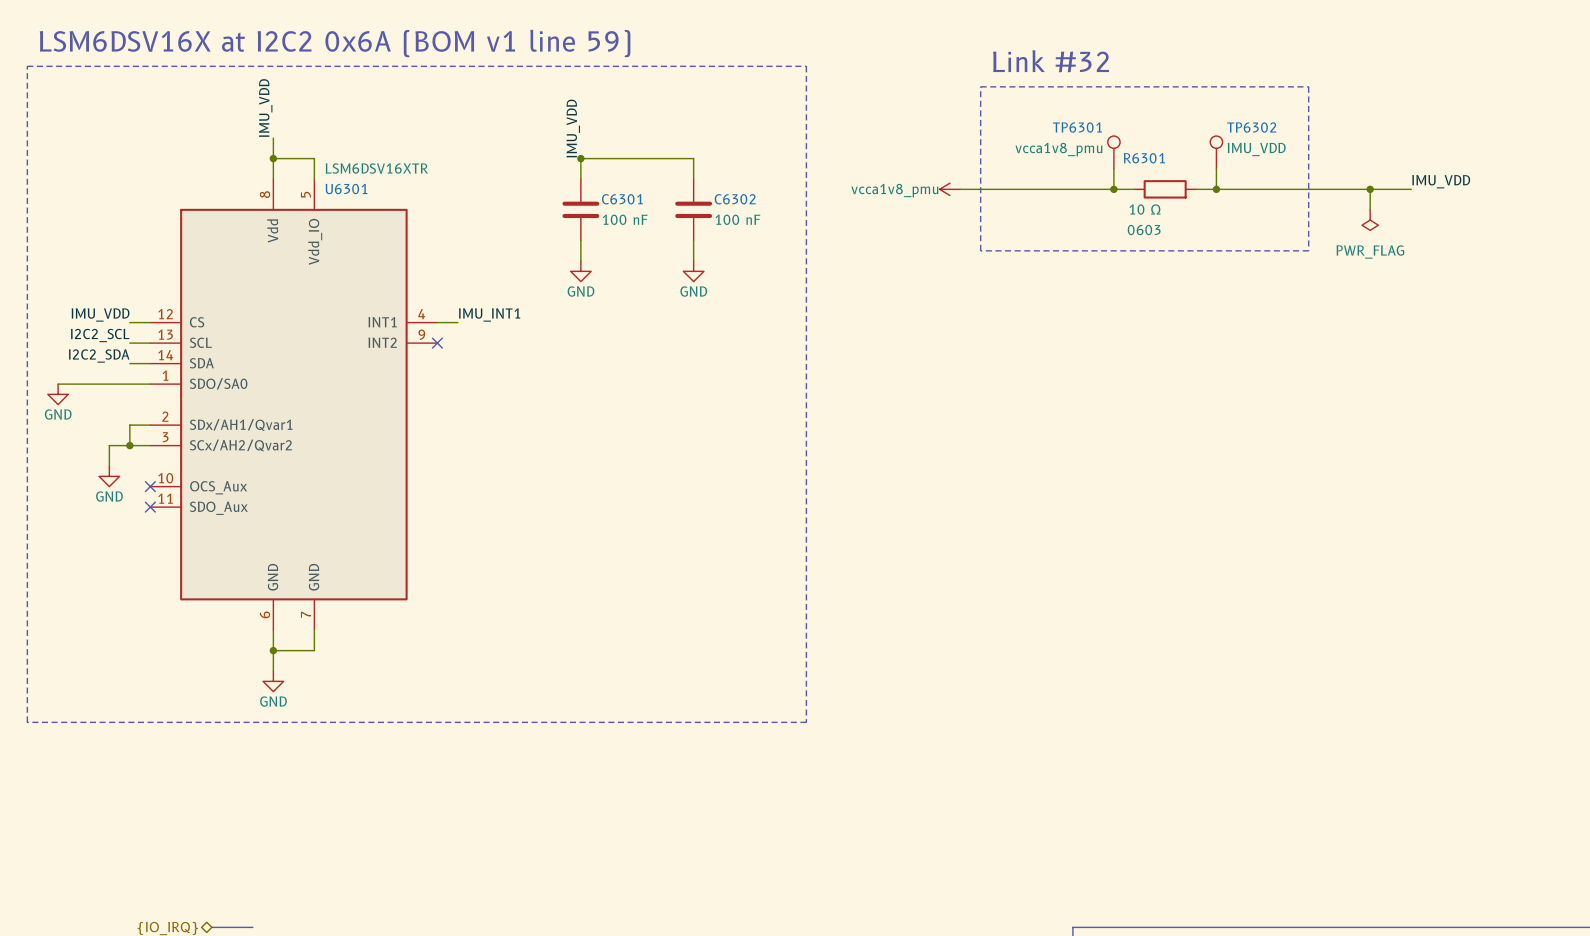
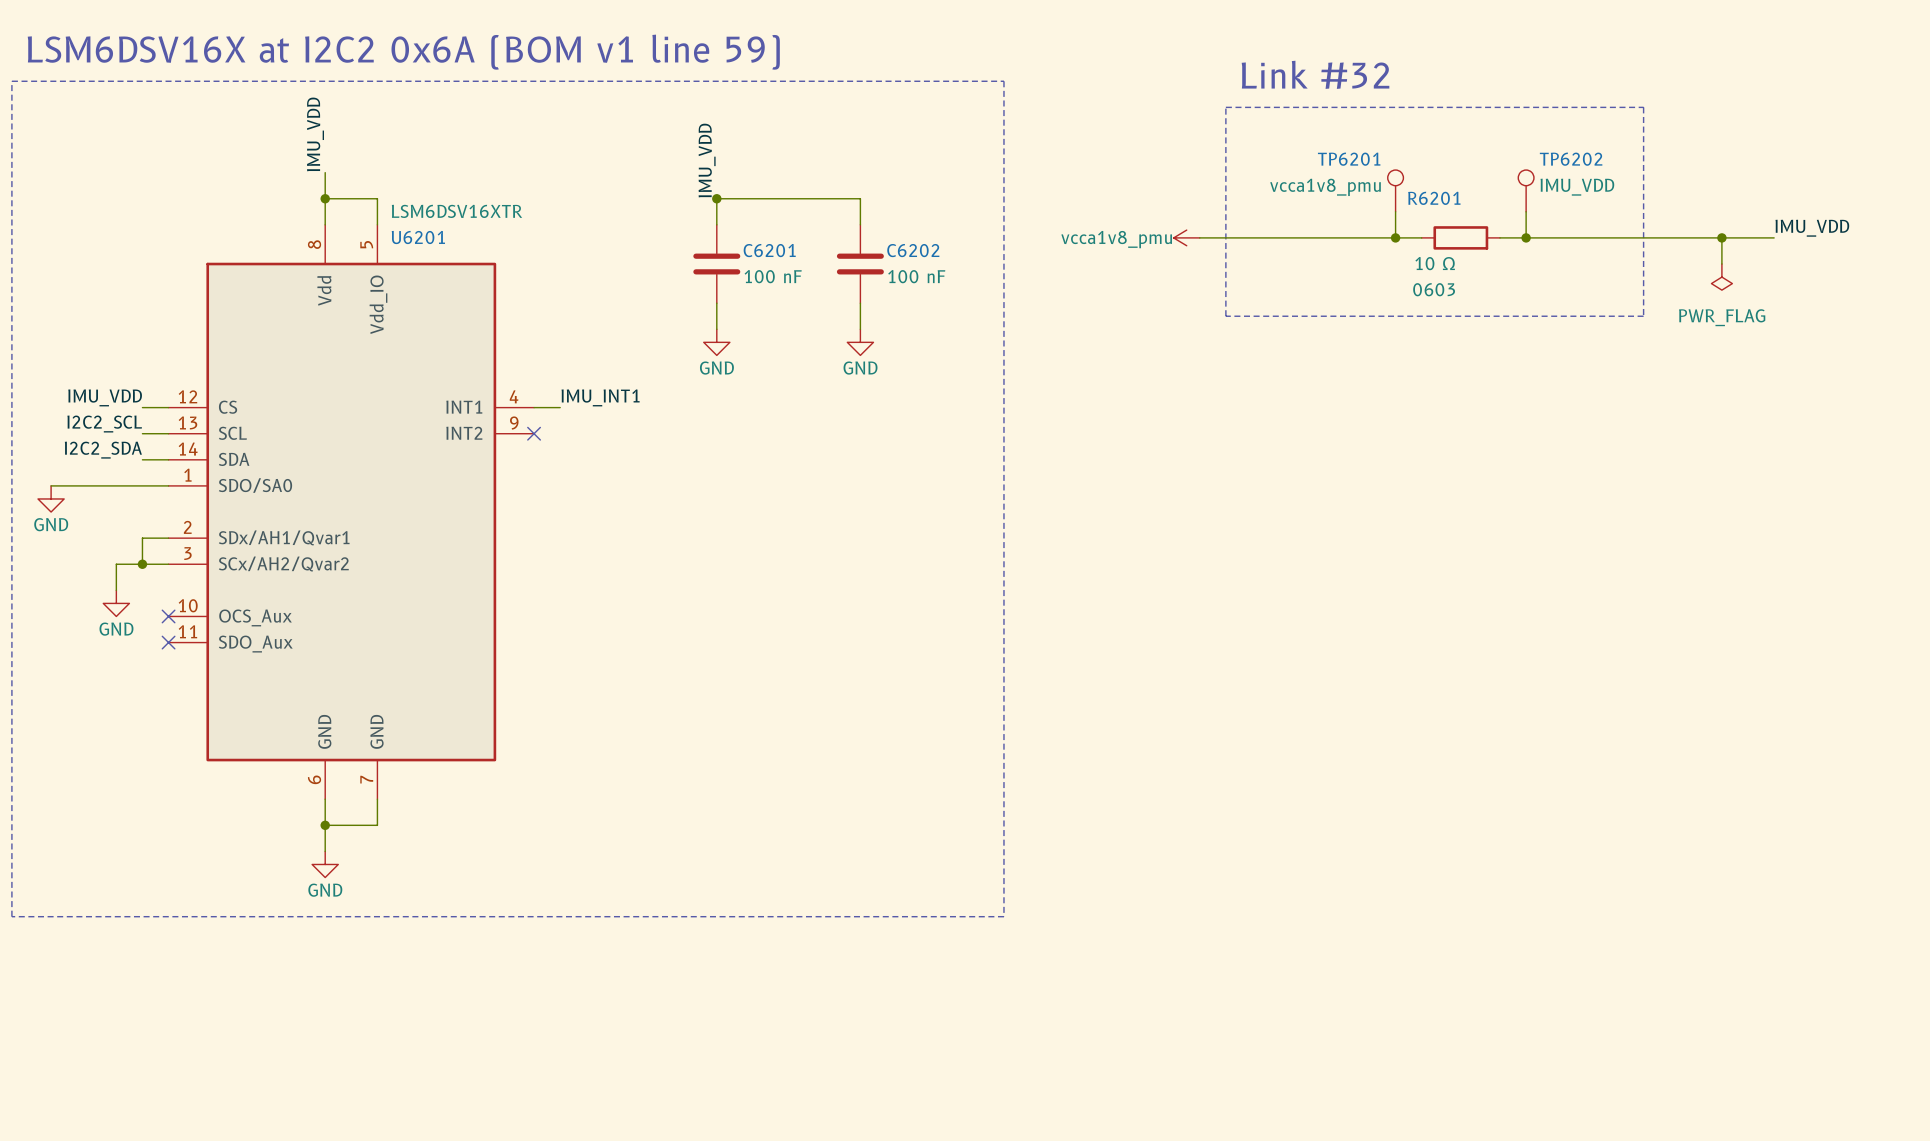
TP6301 name: TP6301 (1077, 127) -> TP6201 (1349, 159)
TP6302 name: TP6302 (1251, 127) -> TP6202 (1571, 159)
R6301 name: R6301 (1144, 158) -> R6201 (1434, 198)
U6301 name: U6301 (346, 189) -> U6201 (418, 237)
C6301 name: C6301 (622, 199) -> C6201 (769, 250)
C6302 name: C6302 (735, 199) -> C6202 (913, 250)

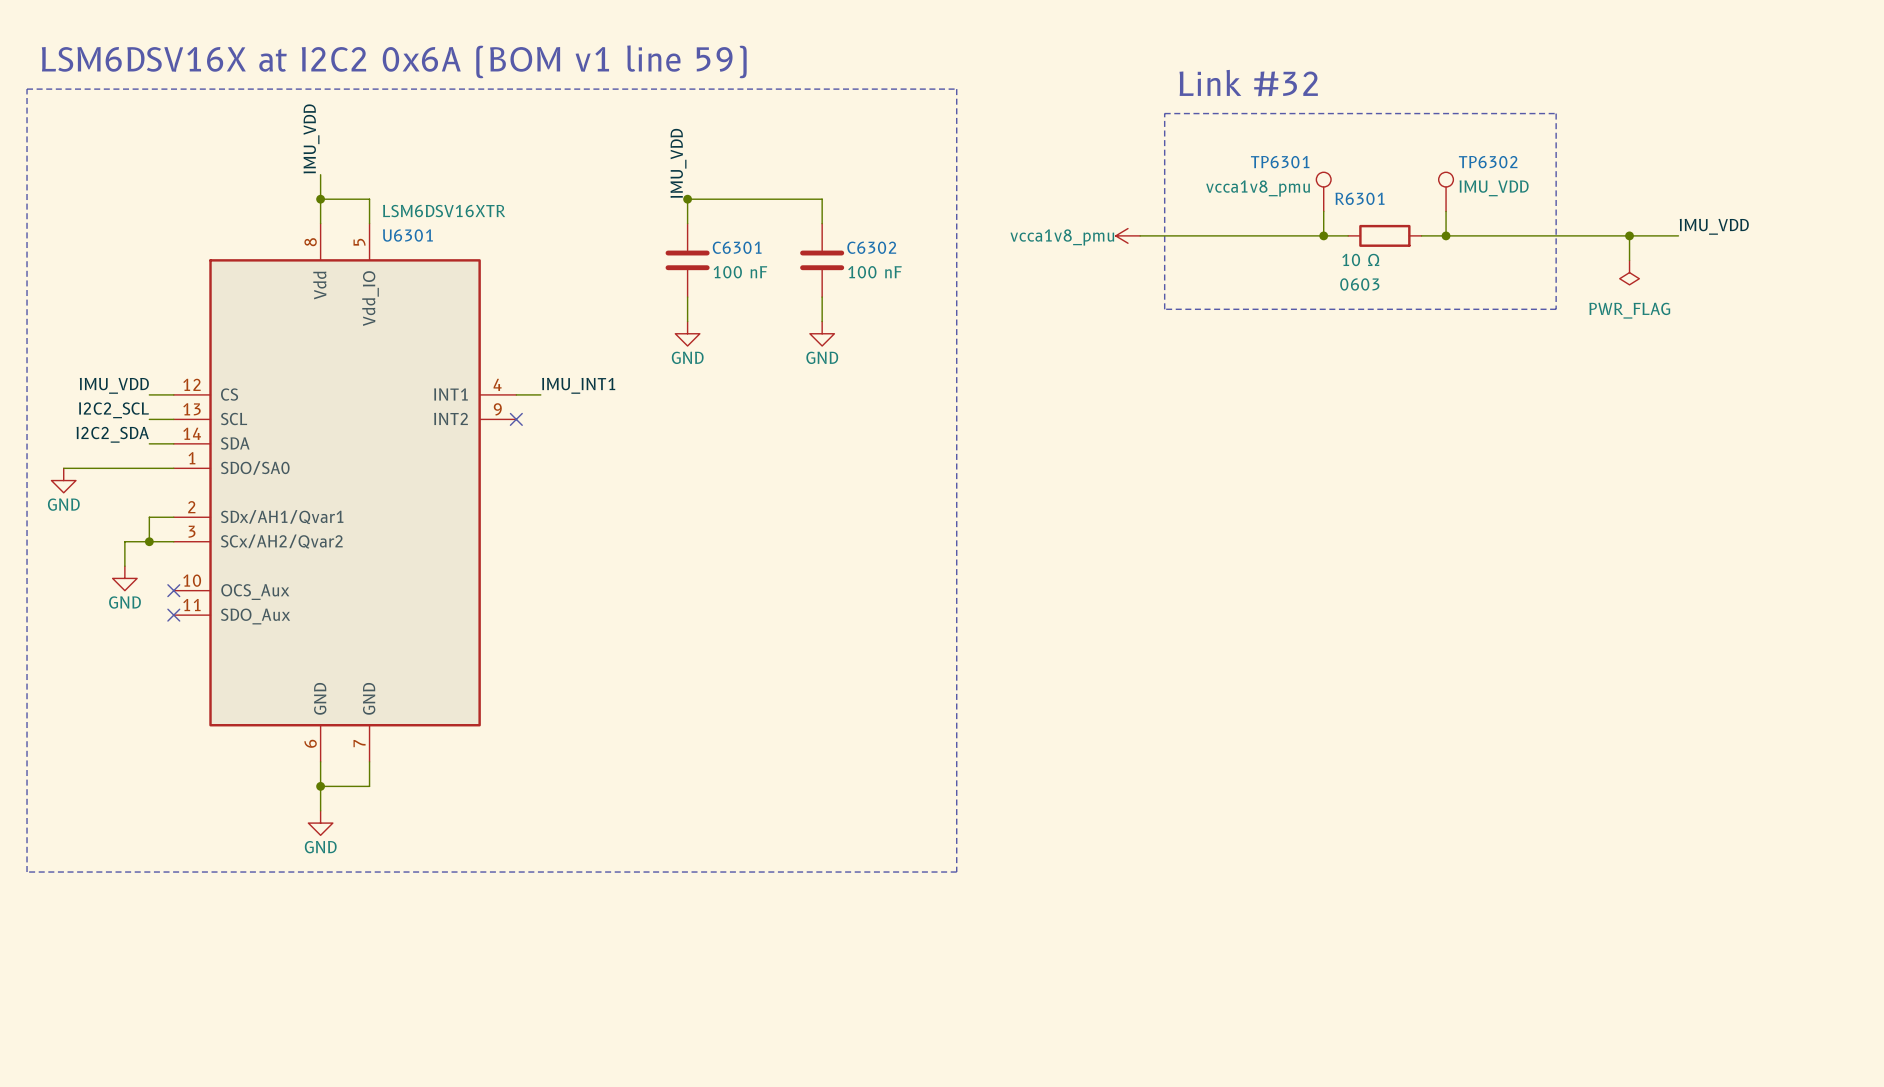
TP6201 name: TP6201 (1349, 159) -> TP6301 (1280, 162)
TP6202 name: TP6202 (1571, 159) -> TP6302 (1488, 162)
R6201 name: R6201 (1434, 198) -> R6301 (1360, 198)
U6201 name: U6201 (418, 237) -> U6301 (407, 235)
C6201 name: C6201 (769, 250) -> C6301 (737, 247)
C6202 name: C6202 (913, 250) -> C6302 (871, 247)

